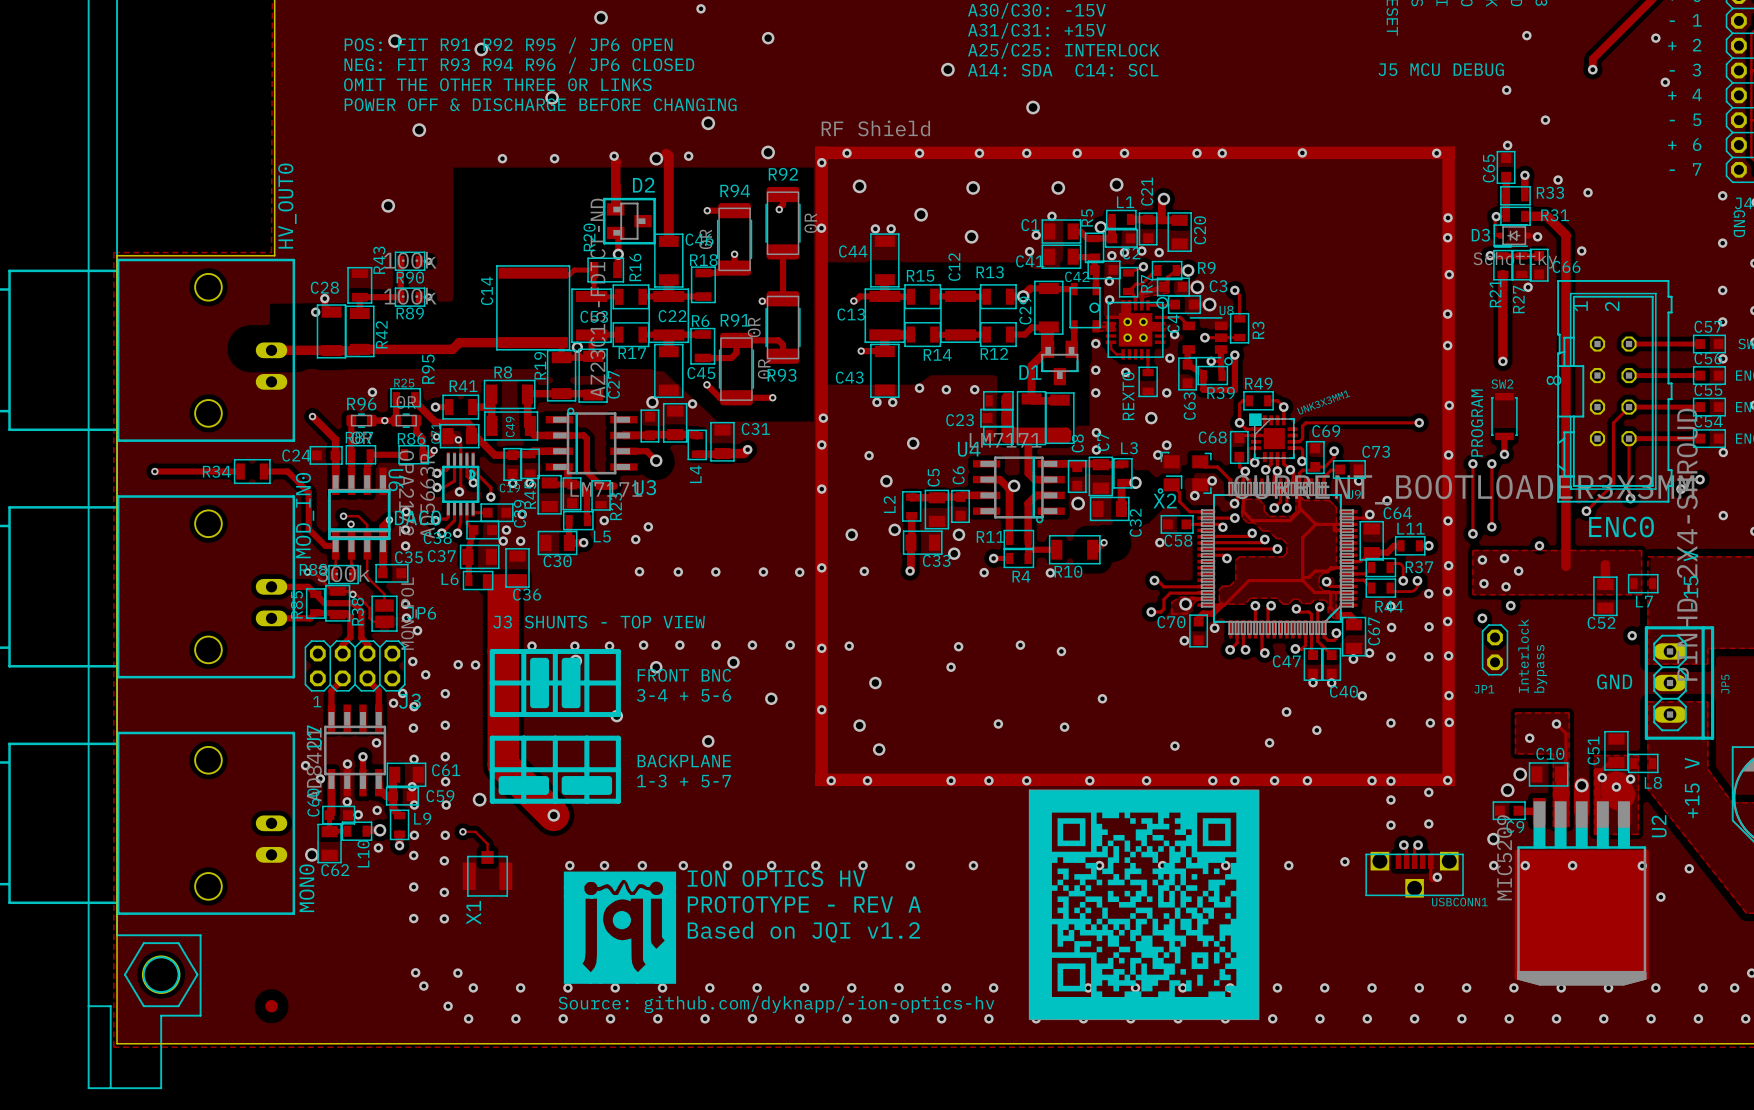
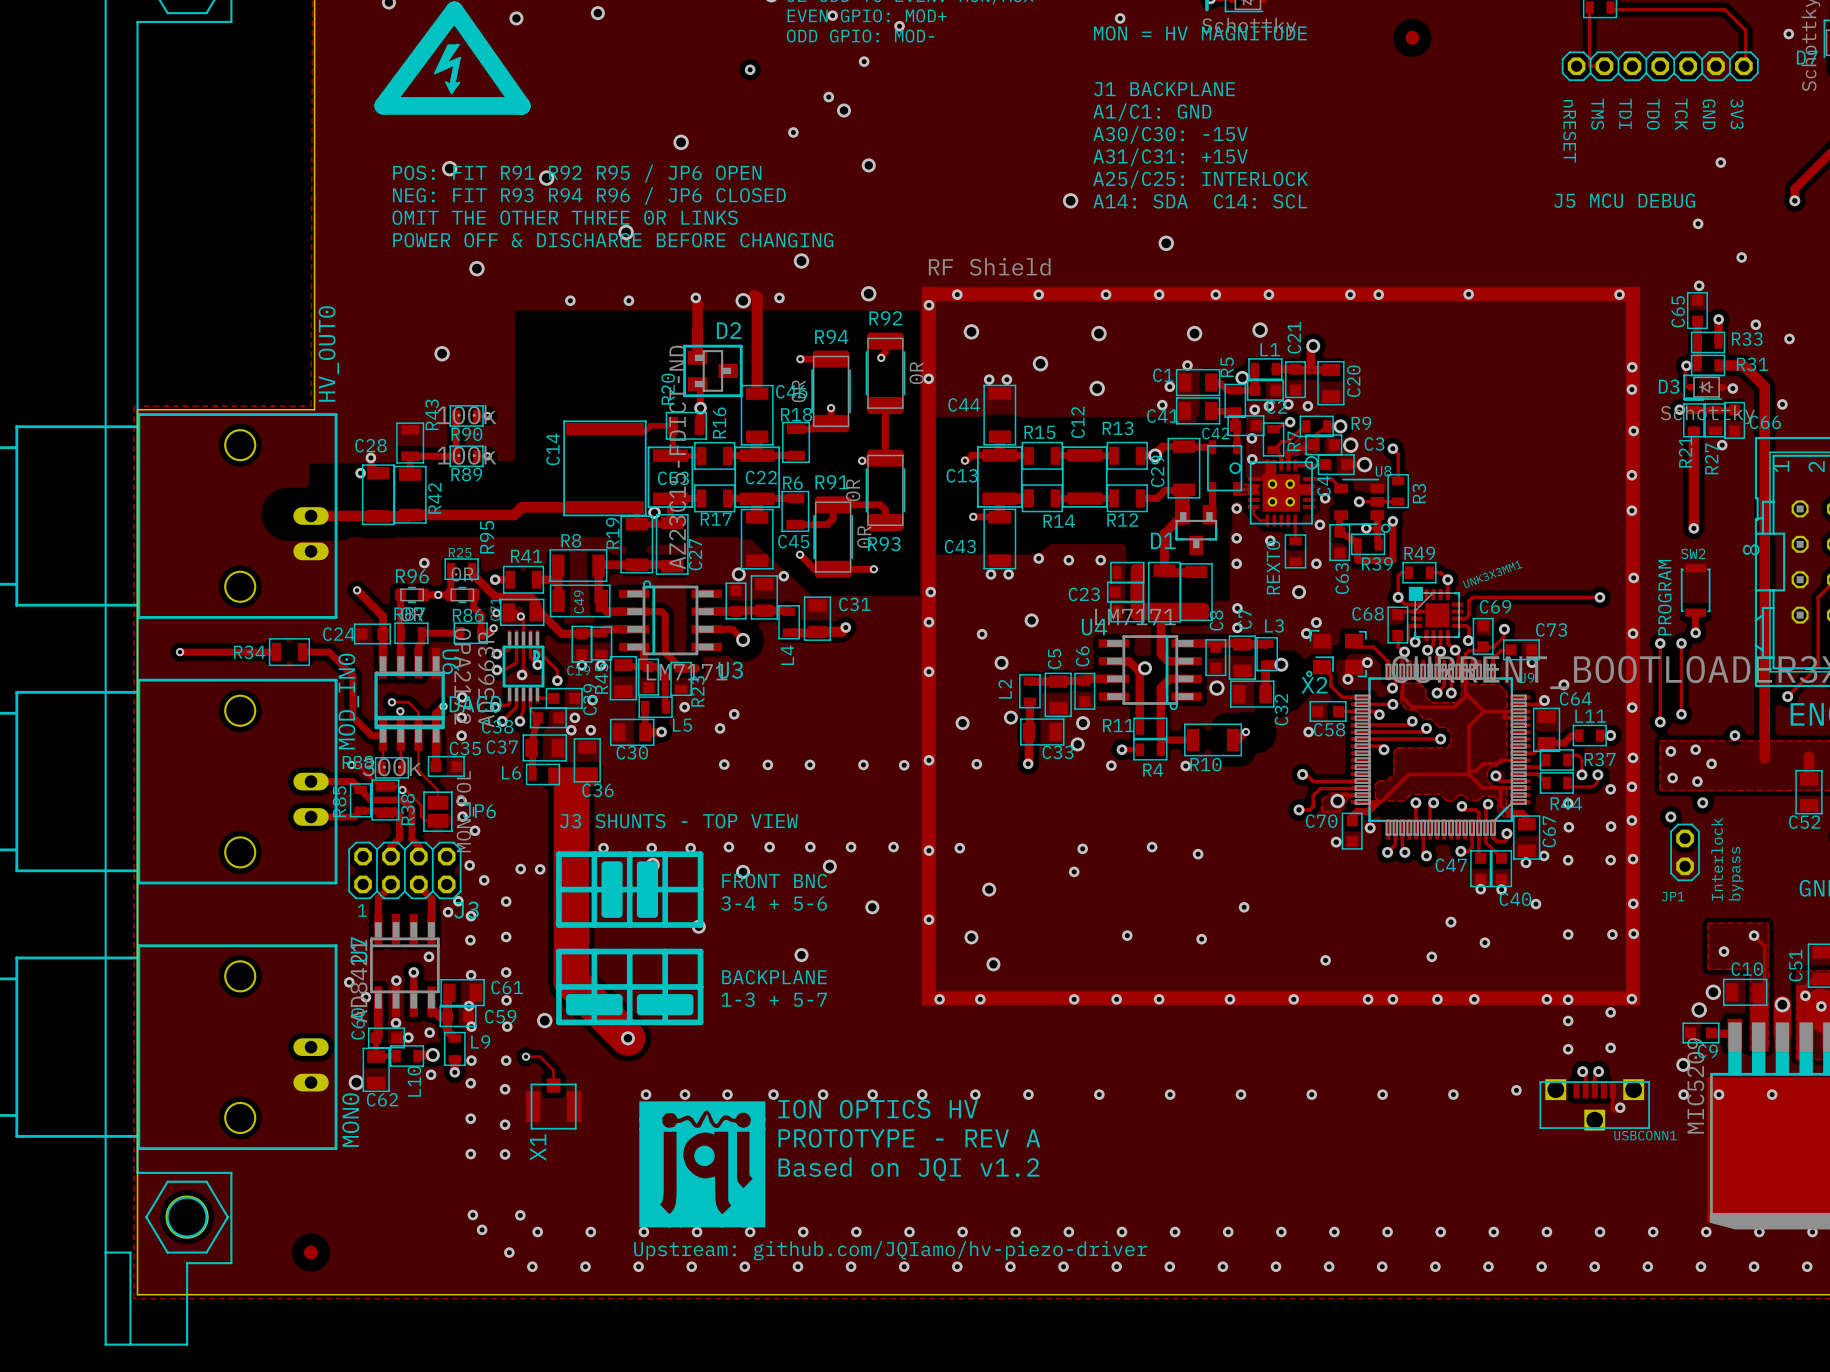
drawing: [1028, 789, 1260, 1020] -> none
text: Source: github.com/dyknapp/-ion-optics-hv (776, 1004) -> Upstream: github.com/JQIamo/hv-piezo-driver (890, 1250)

